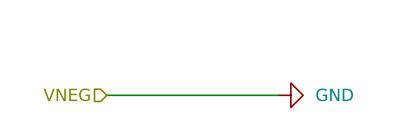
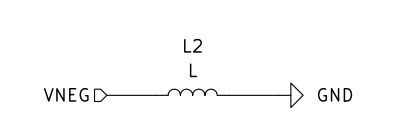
L2: none -> L (192, 92)
wire: (155, 95) (229, 95) -> none

